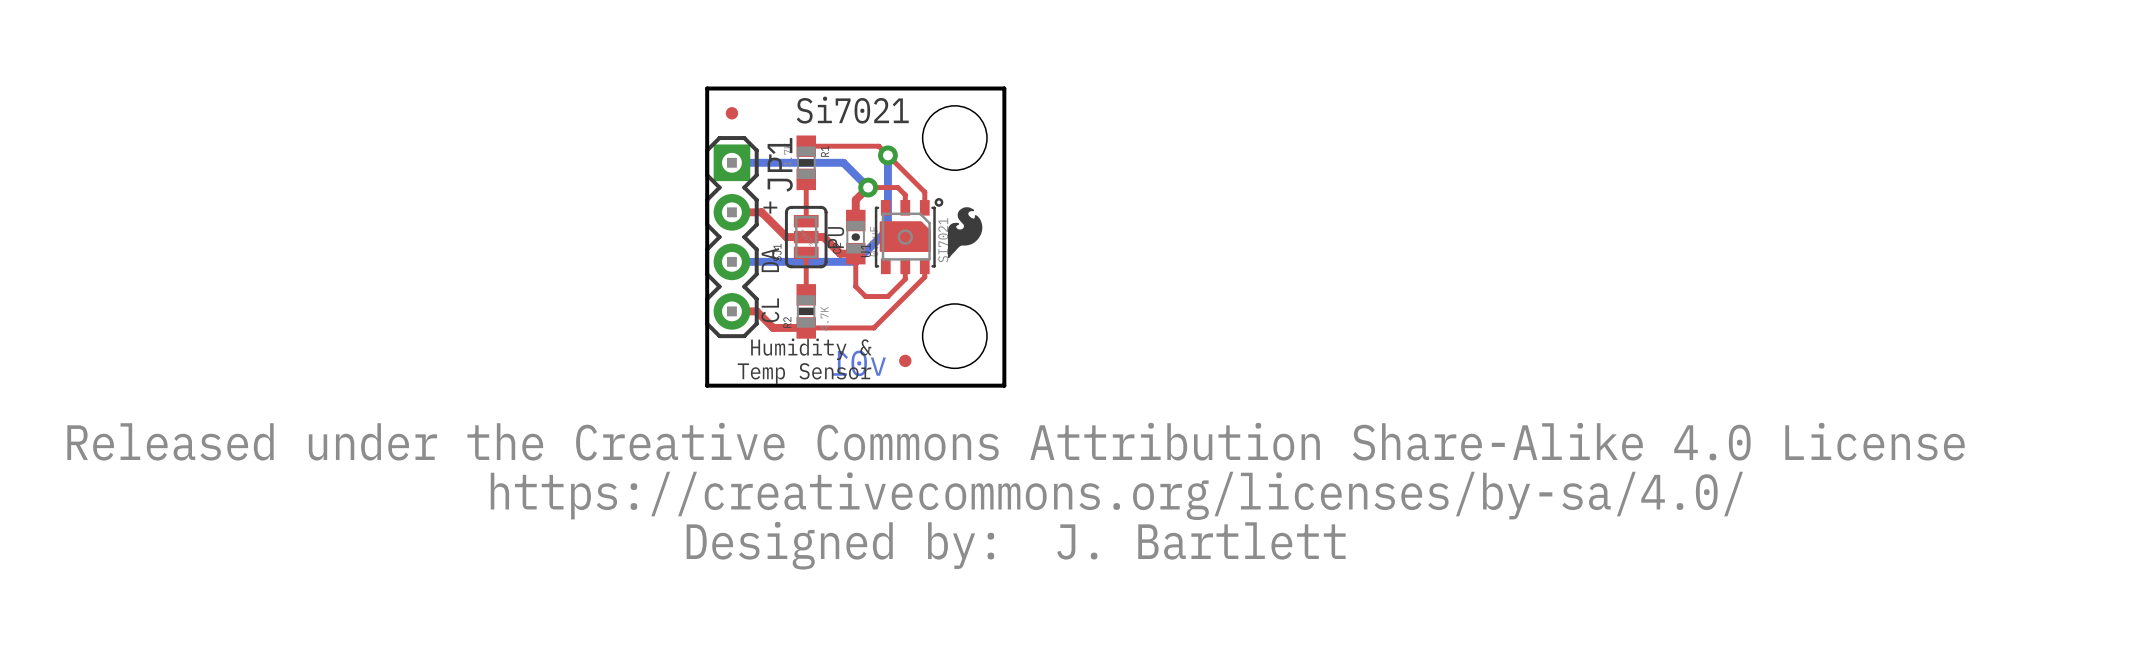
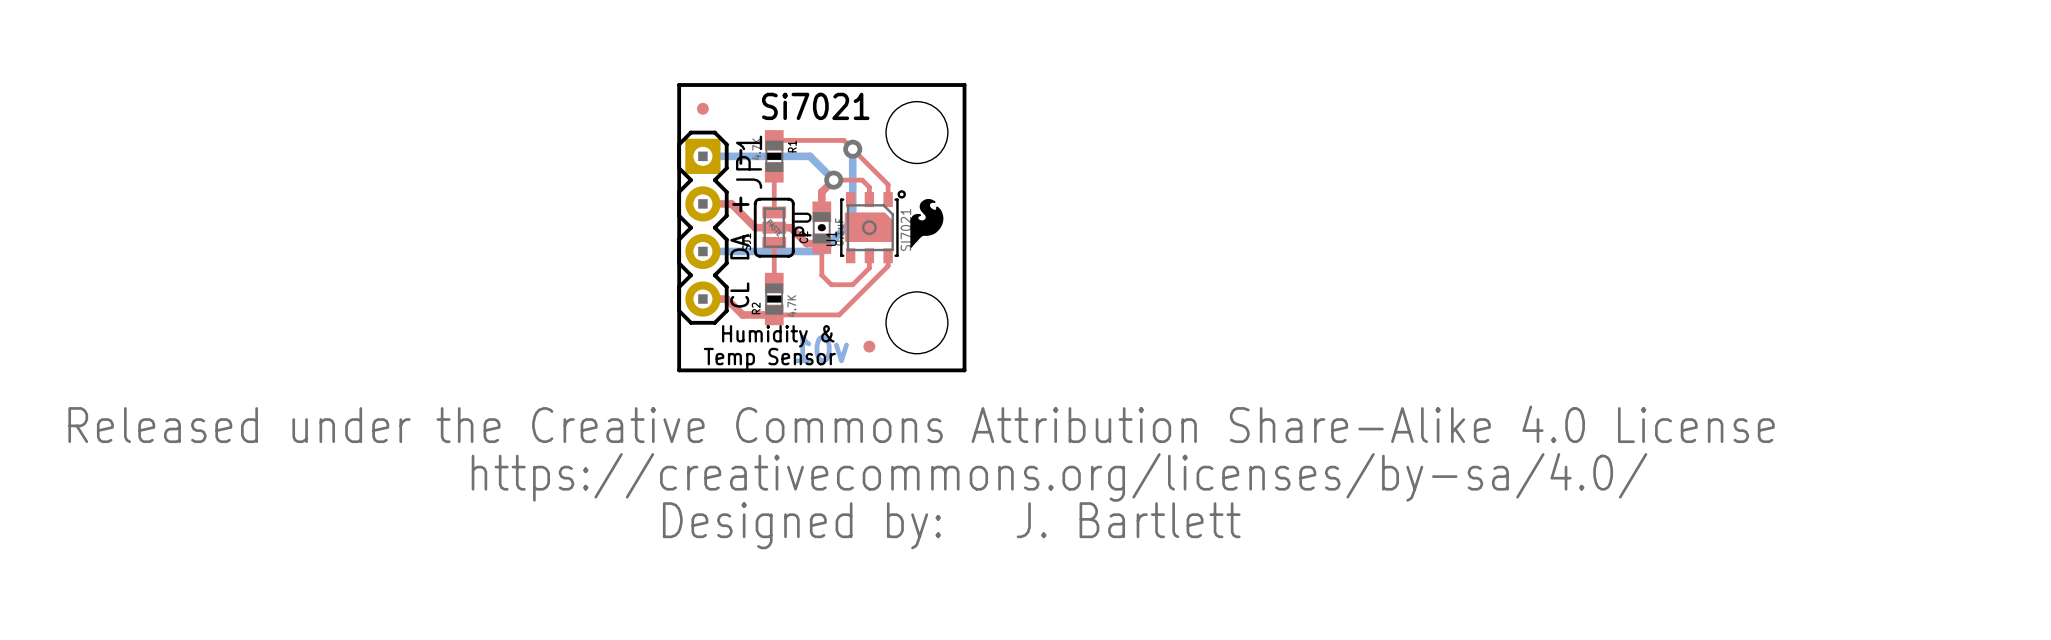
U1 footprint: [874, 198, 944, 275] -> [840, 190, 906, 264]

